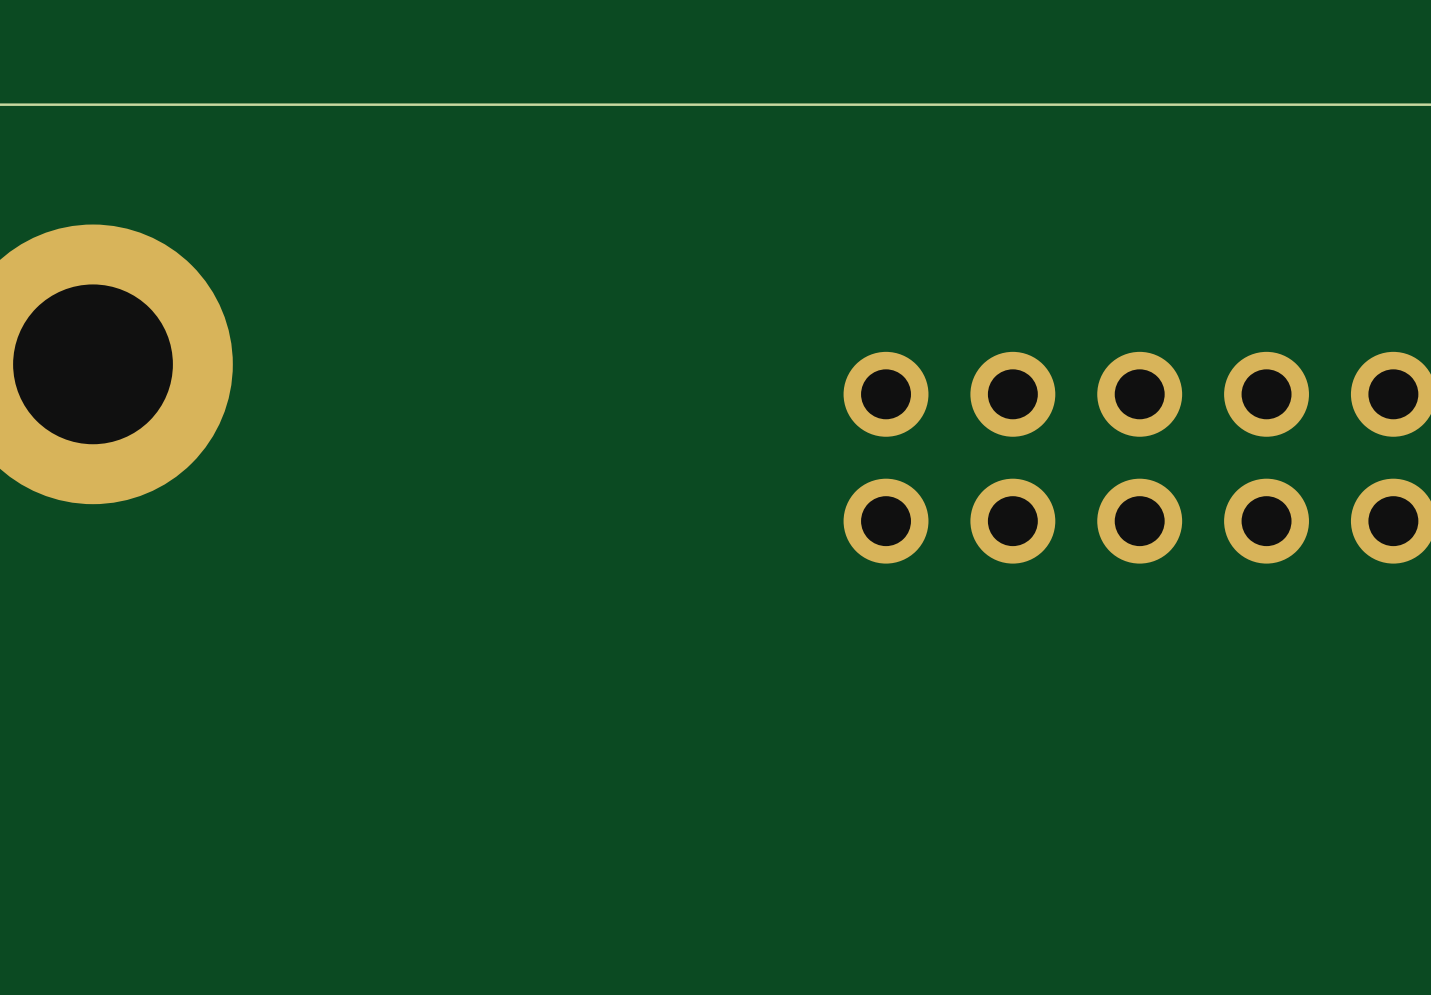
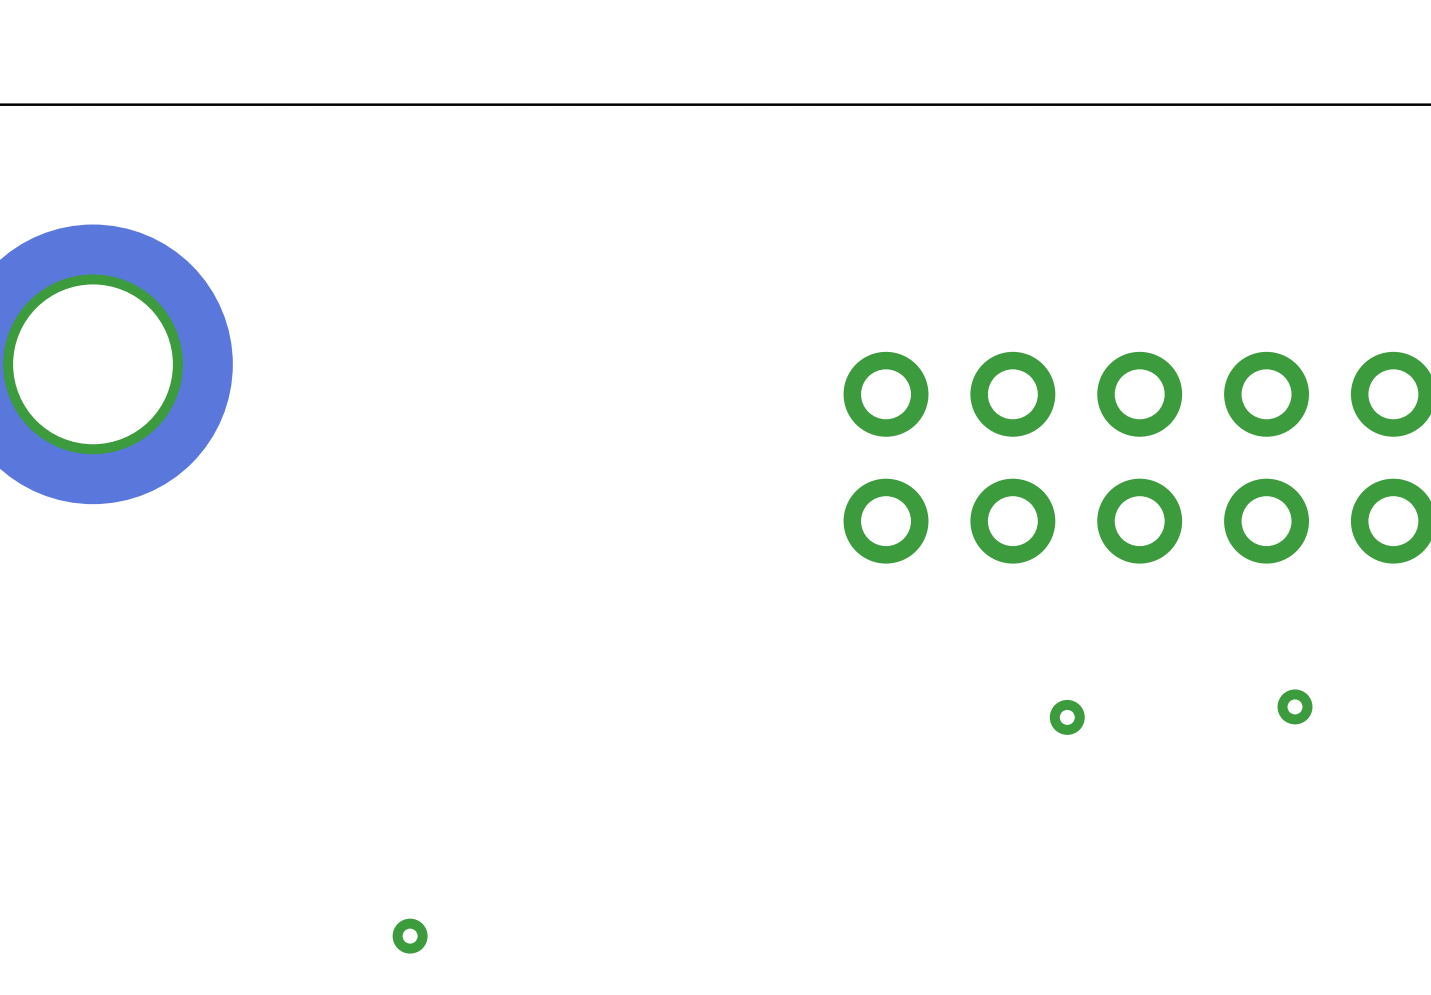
via: none -> (1295, 706)
via: none -> (1067, 717)
via: none -> (410, 936)

